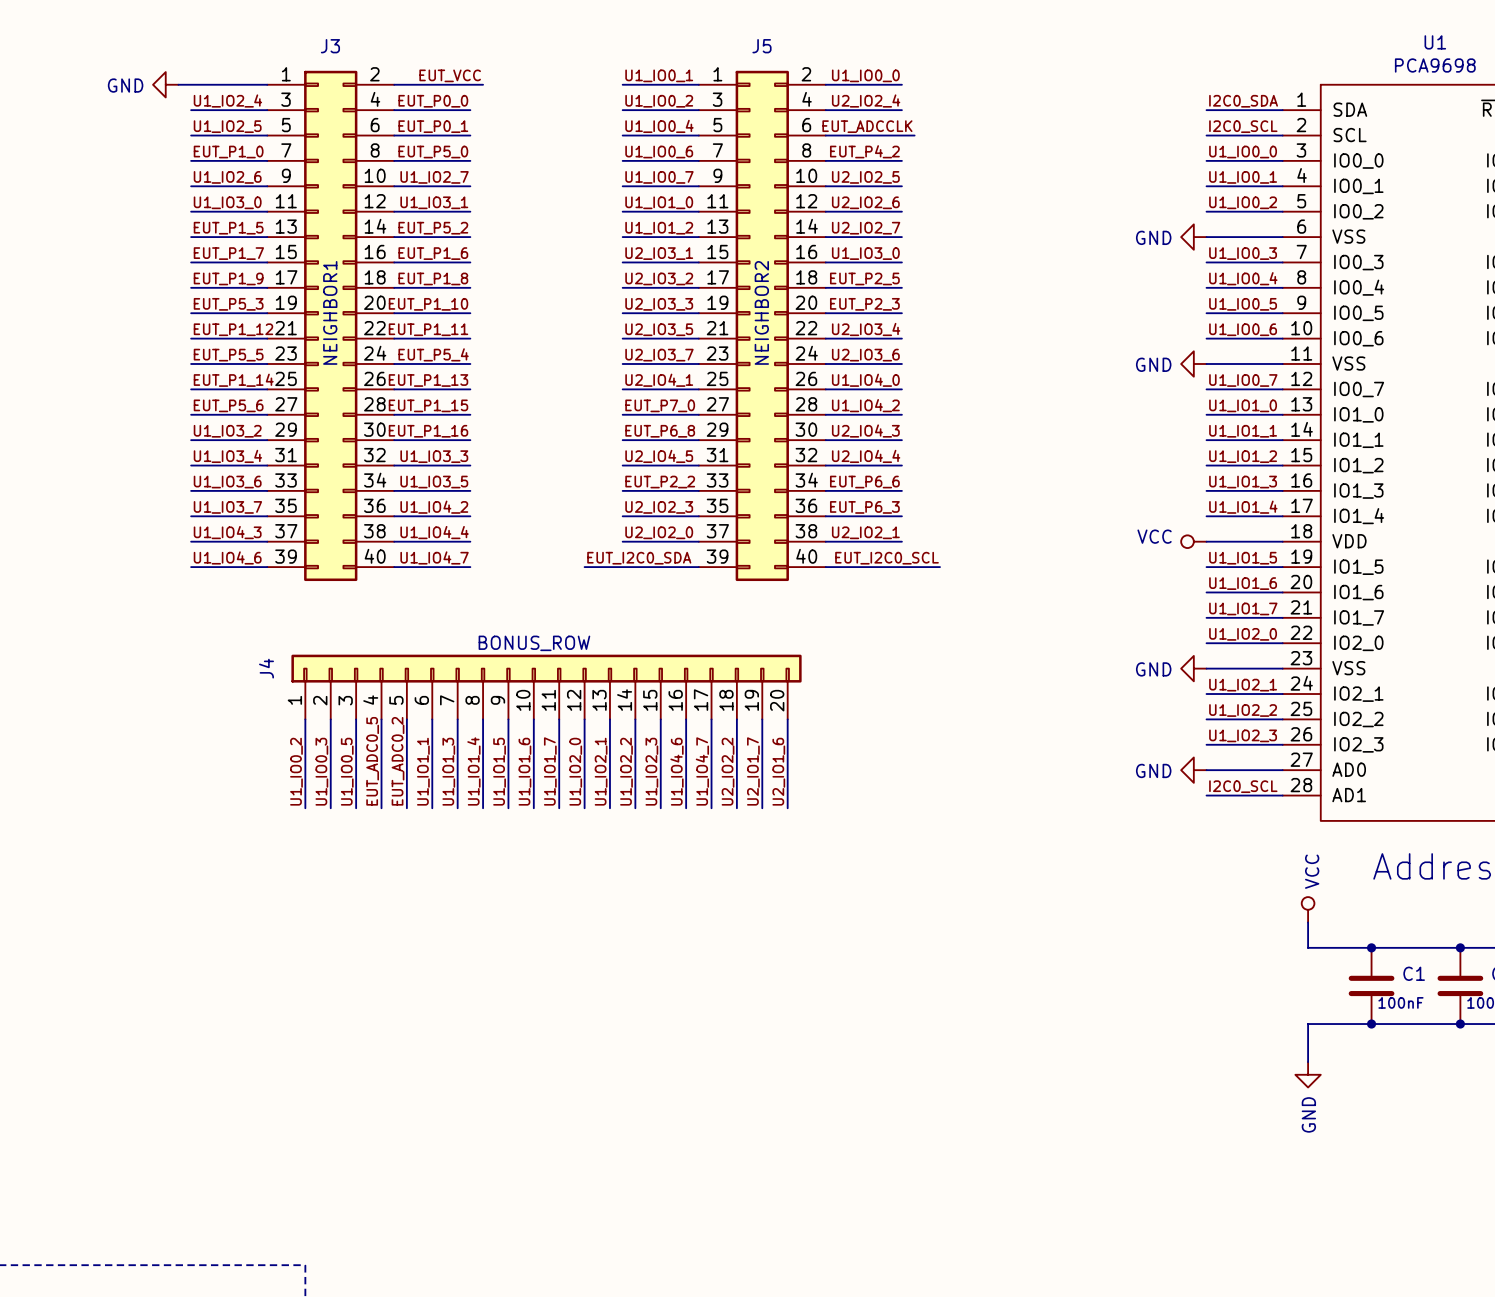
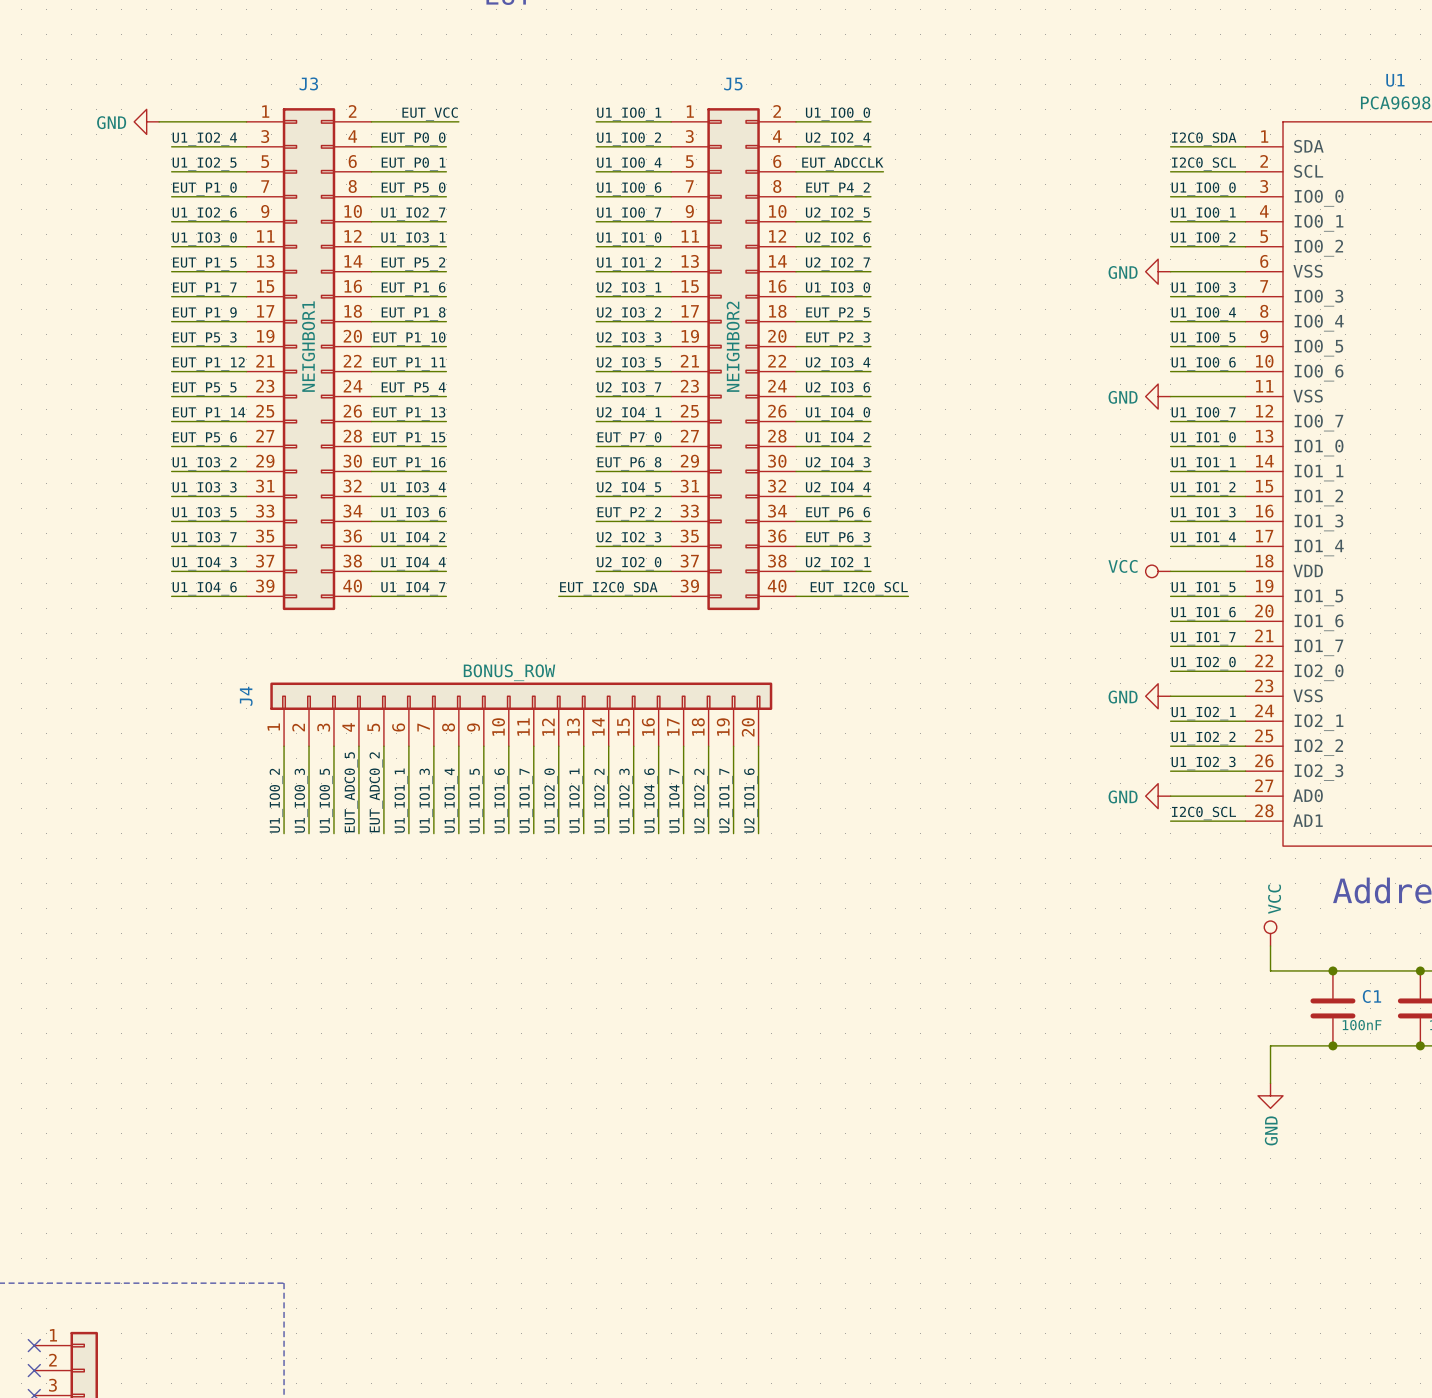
label: U1_IO3_4 (227, 456) -> U1_IO3_3 (204, 488)
label: U1_IO3_3 (434, 456) -> U1_IO3_4 (413, 488)
label: U1_IO3_6 (227, 482) -> U1_IO3_5 (204, 513)
label: U1_IO3_5 (434, 482) -> U1_IO3_6 (413, 513)

